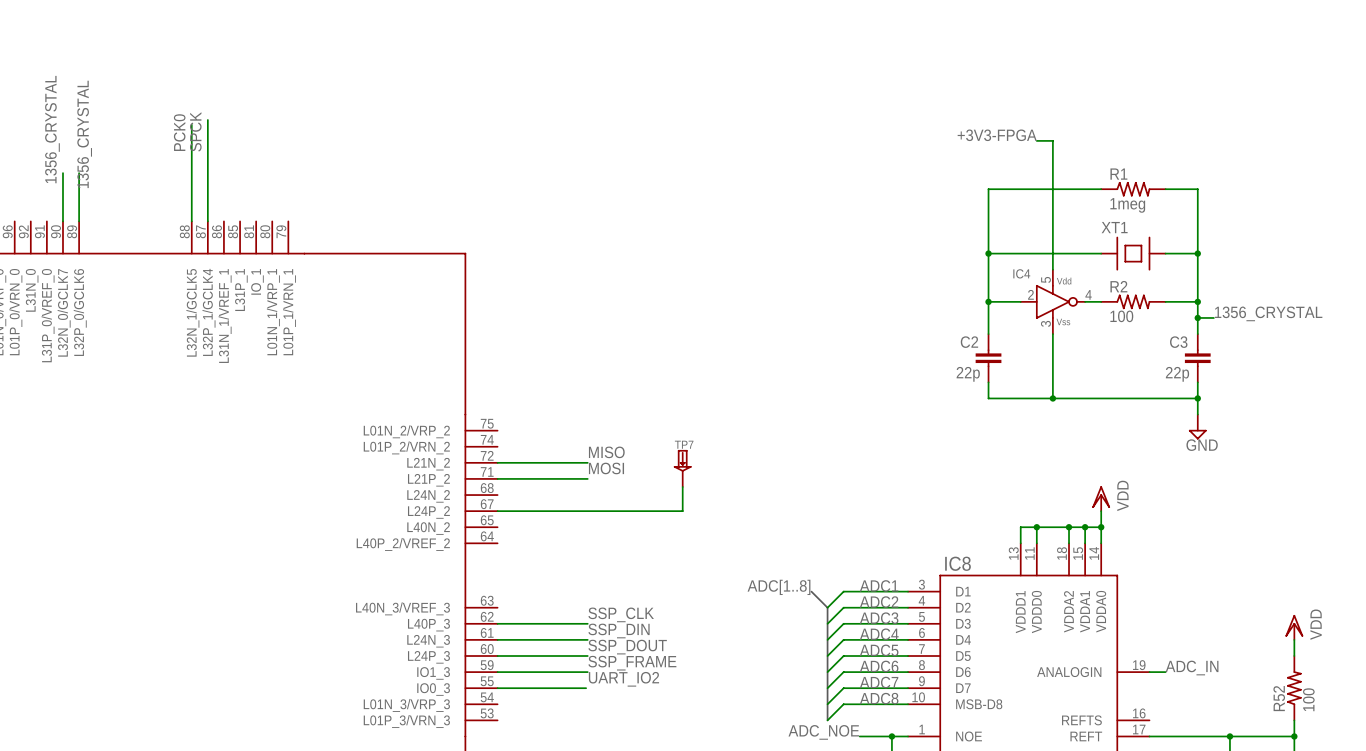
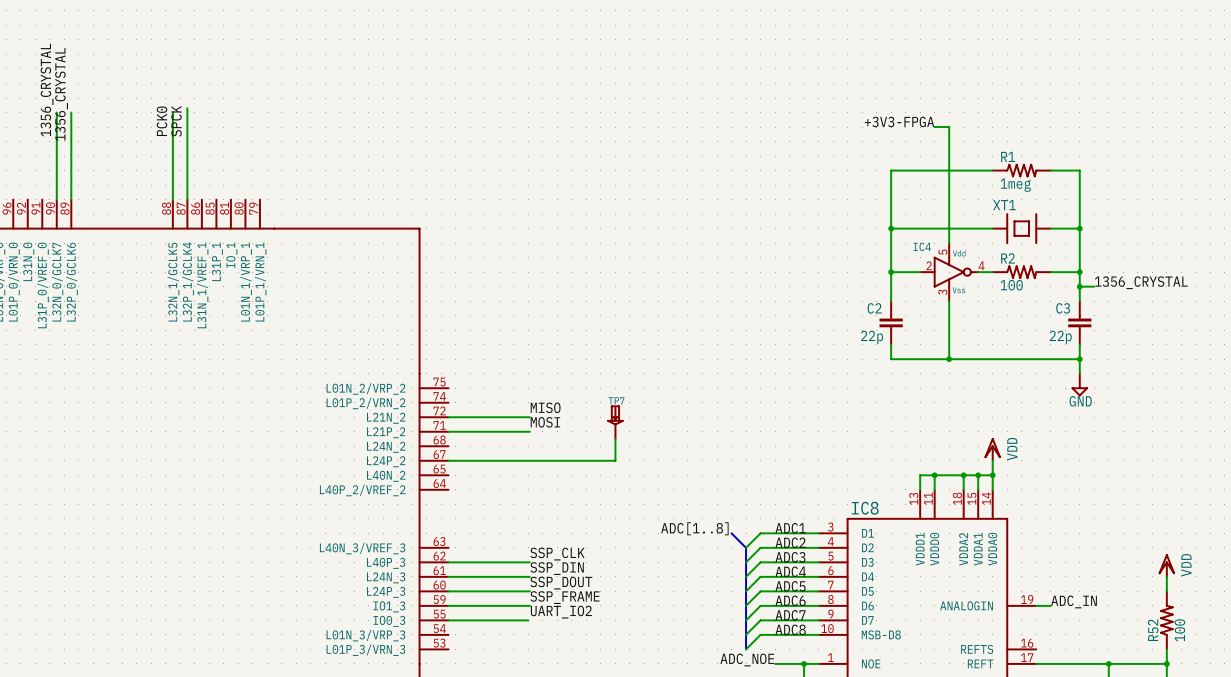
label: none -> 1356_CRYSTAL (47, 90)
label: none -> 1356_CRYSTAL (61, 94)
wire: none -> (56, 112) (56, 156)
wire: none -> (71, 112) (71, 156)
label: 1356_CRYSTAL (52, 129) -> none
label: 1356_CRYSTAL (84, 134) -> none

